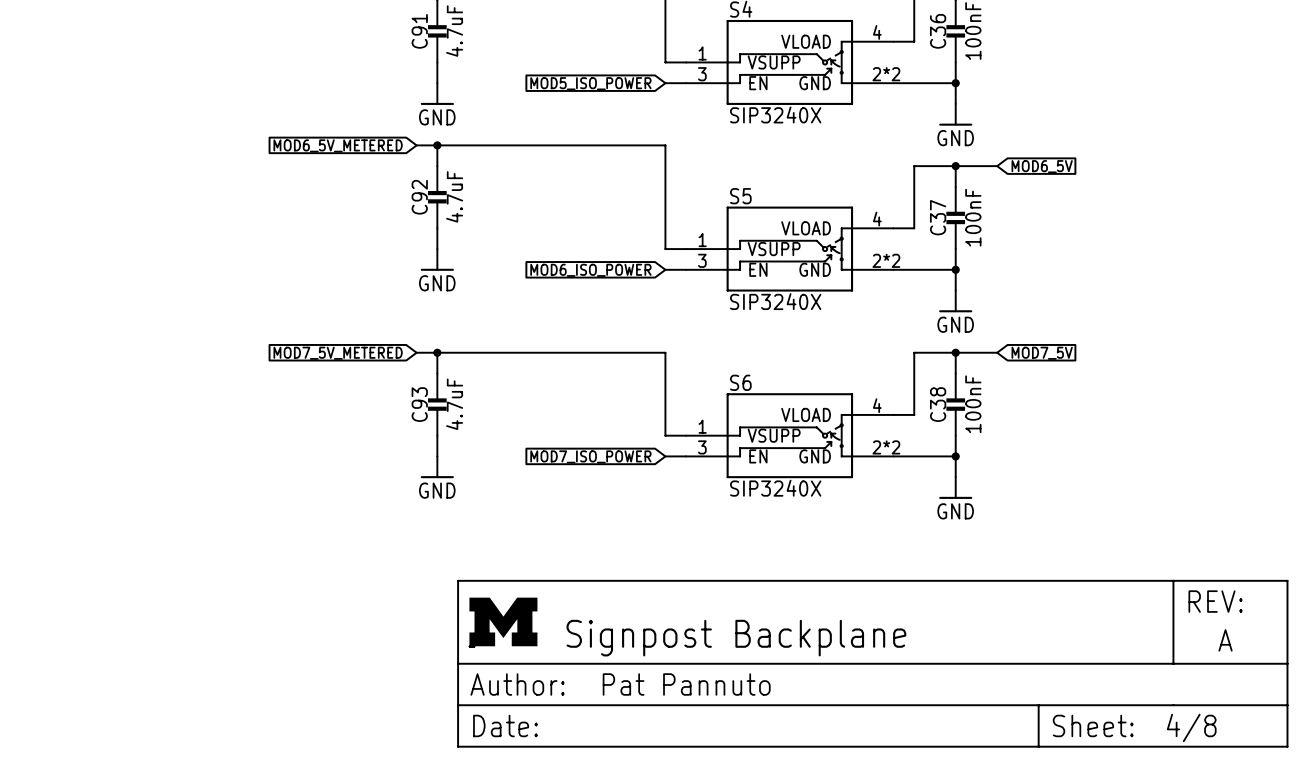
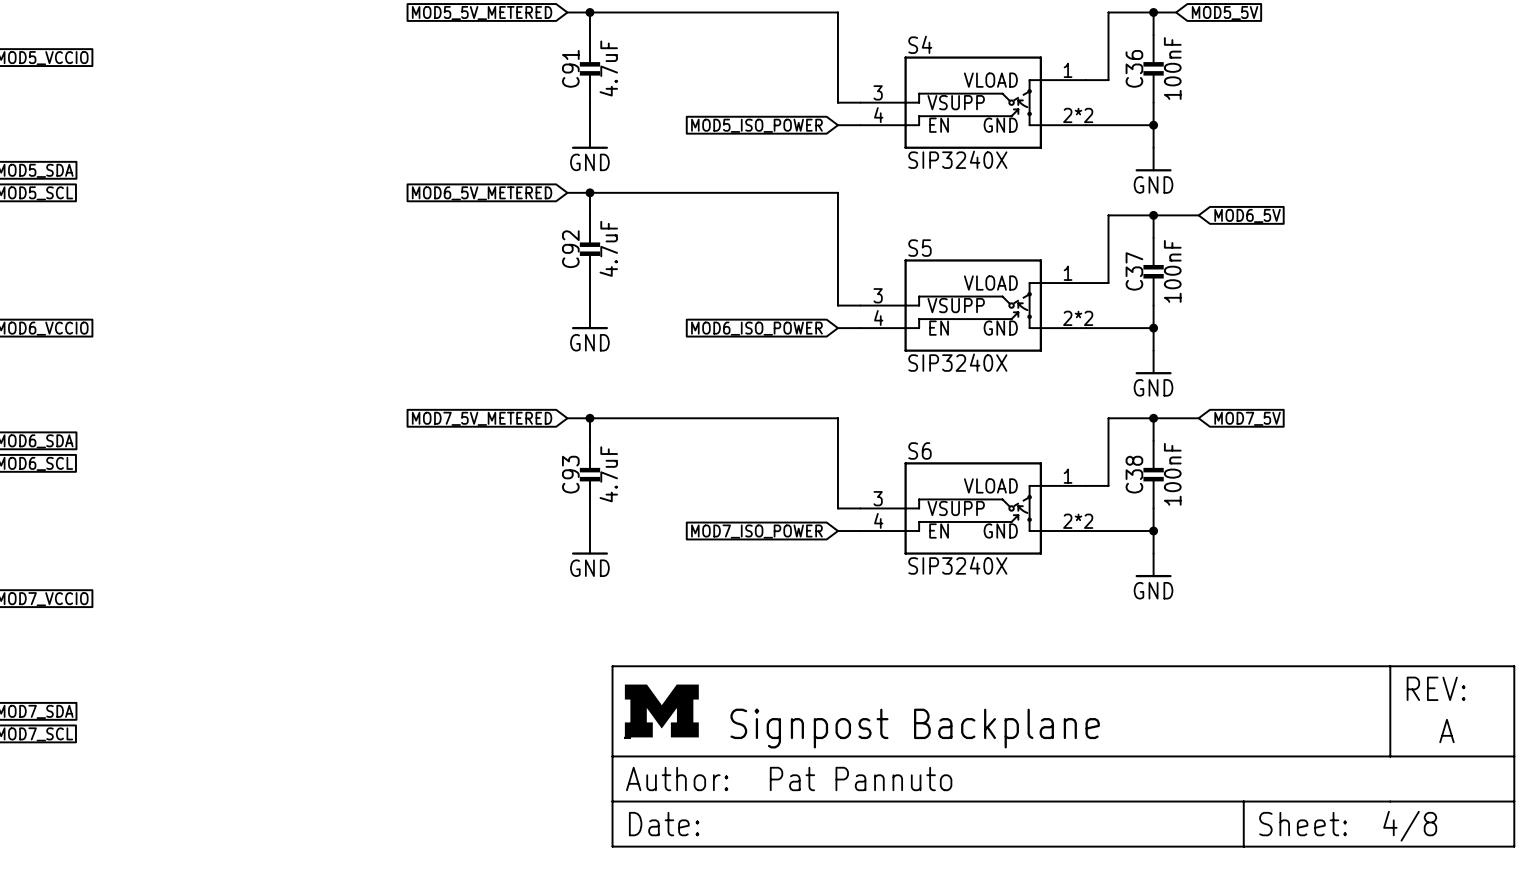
S4 pin number: 4 (877, 32) -> 1 (1068, 70)
S4 pin number: 1 (702, 53) -> 3 (878, 92)
S4 pin number: 3 (702, 74) -> 4 (878, 115)
S5 pin number: 4 (877, 219) -> 1 (1068, 273)
S5 pin number: 1 (702, 240) -> 3 (878, 295)
S5 pin number: 3 (702, 260) -> 4 (878, 318)
S6 pin number: 4 (877, 405) -> 1 (1068, 476)
S6 pin number: 1 (702, 426) -> 3 (878, 498)
S6 pin number: 3 (702, 447) -> 4 (878, 520)

